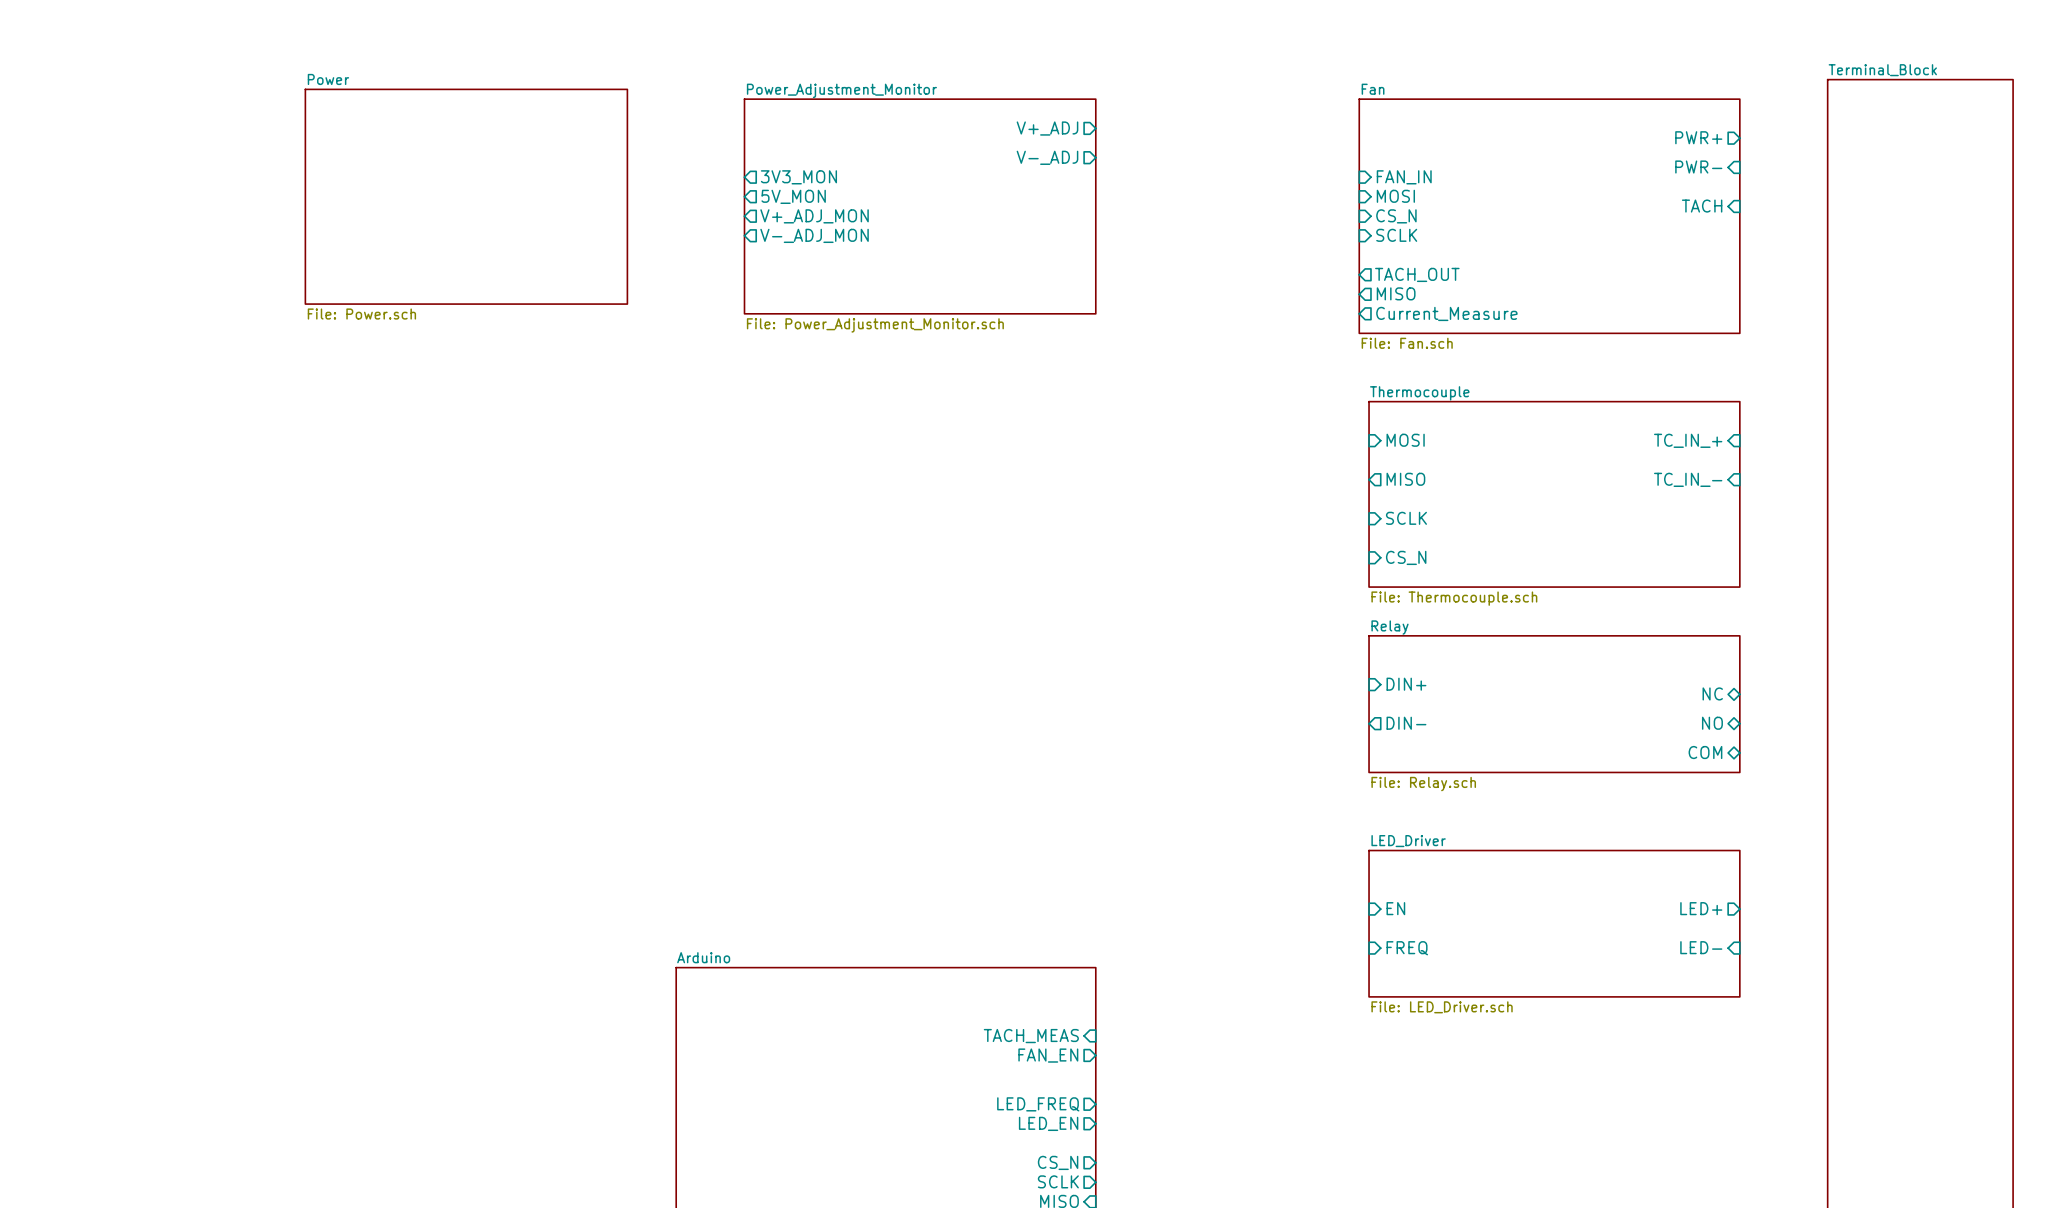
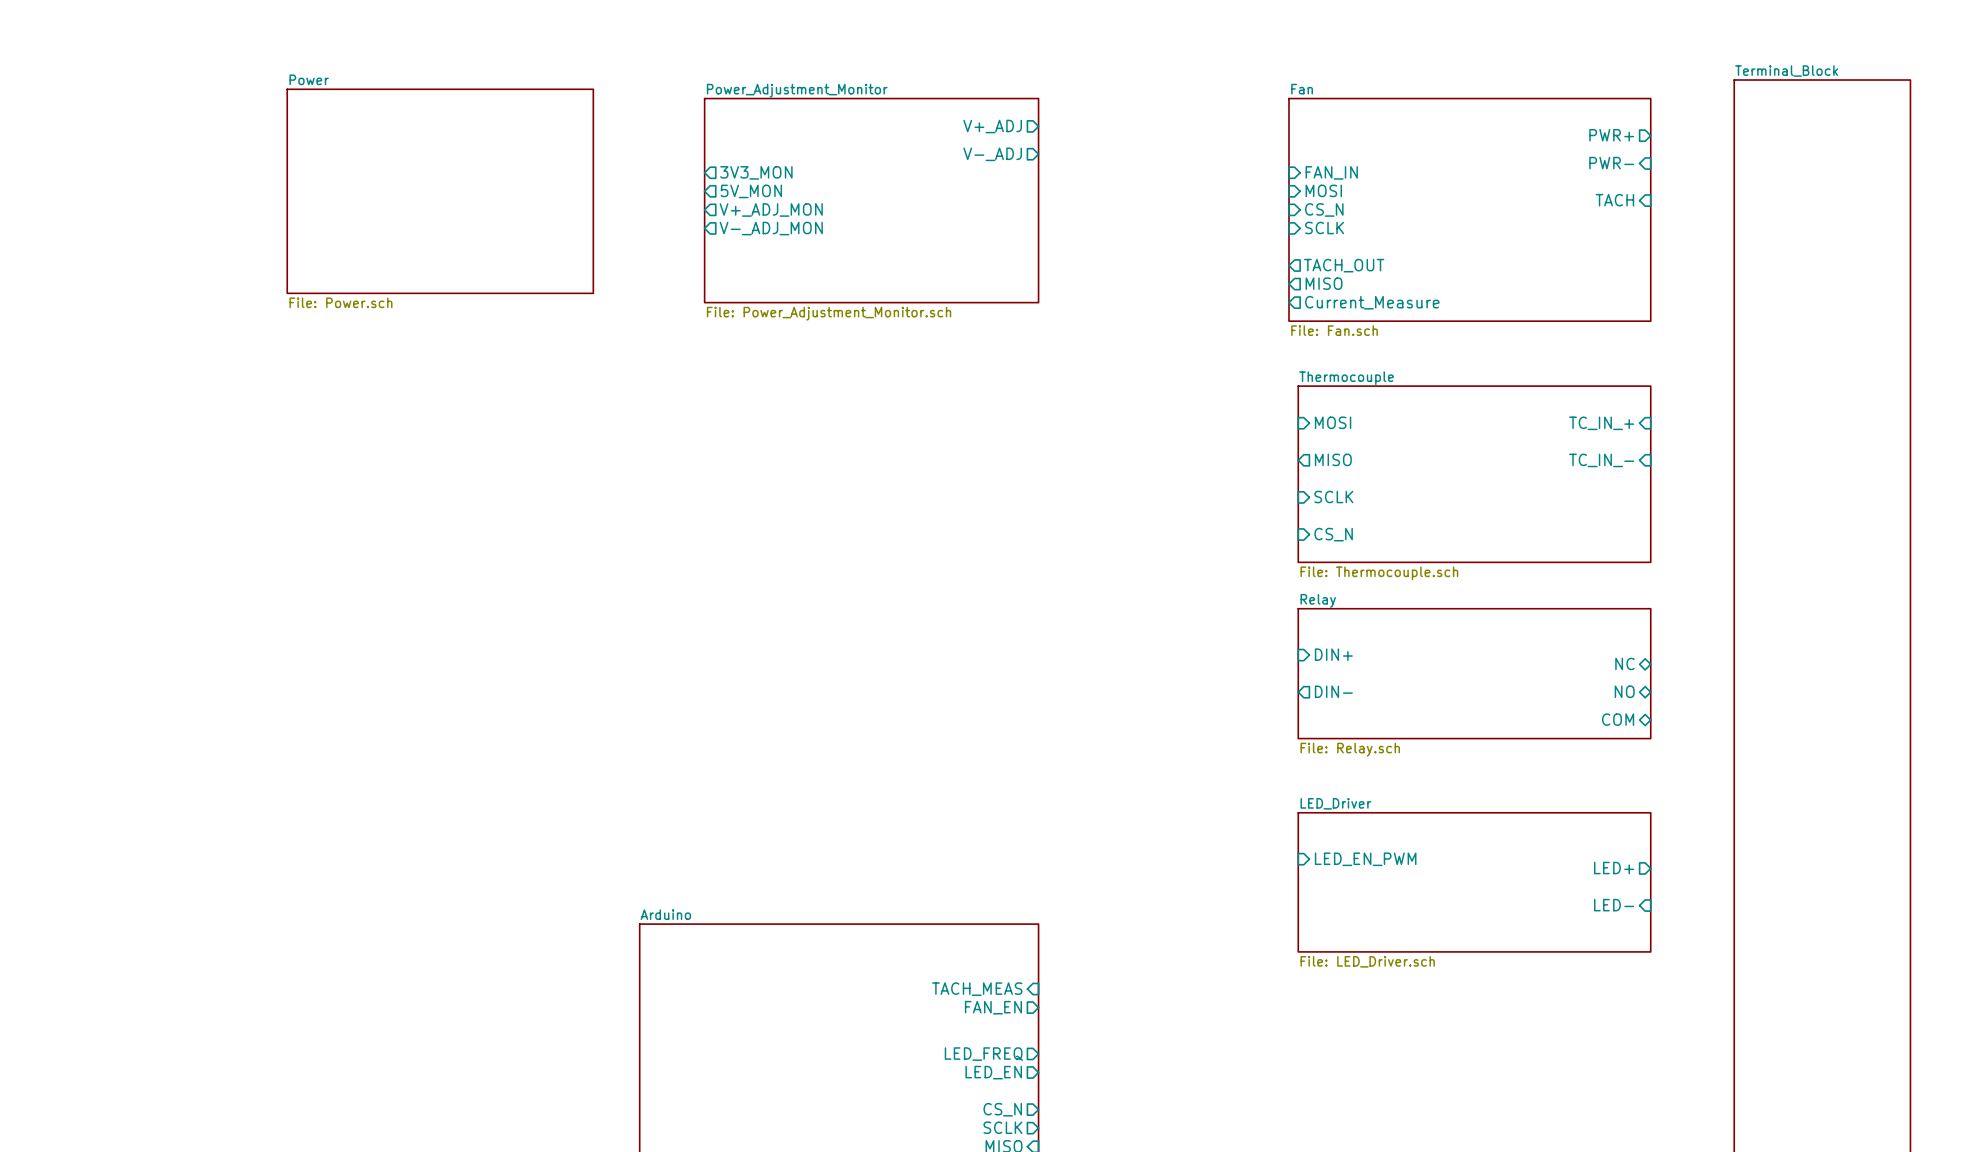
sheet pin: none -> LED_EN_PWM (1365, 859)
sheet pin: EN (1395, 908) -> none
sheet pin: FREQ (1407, 948) -> none

